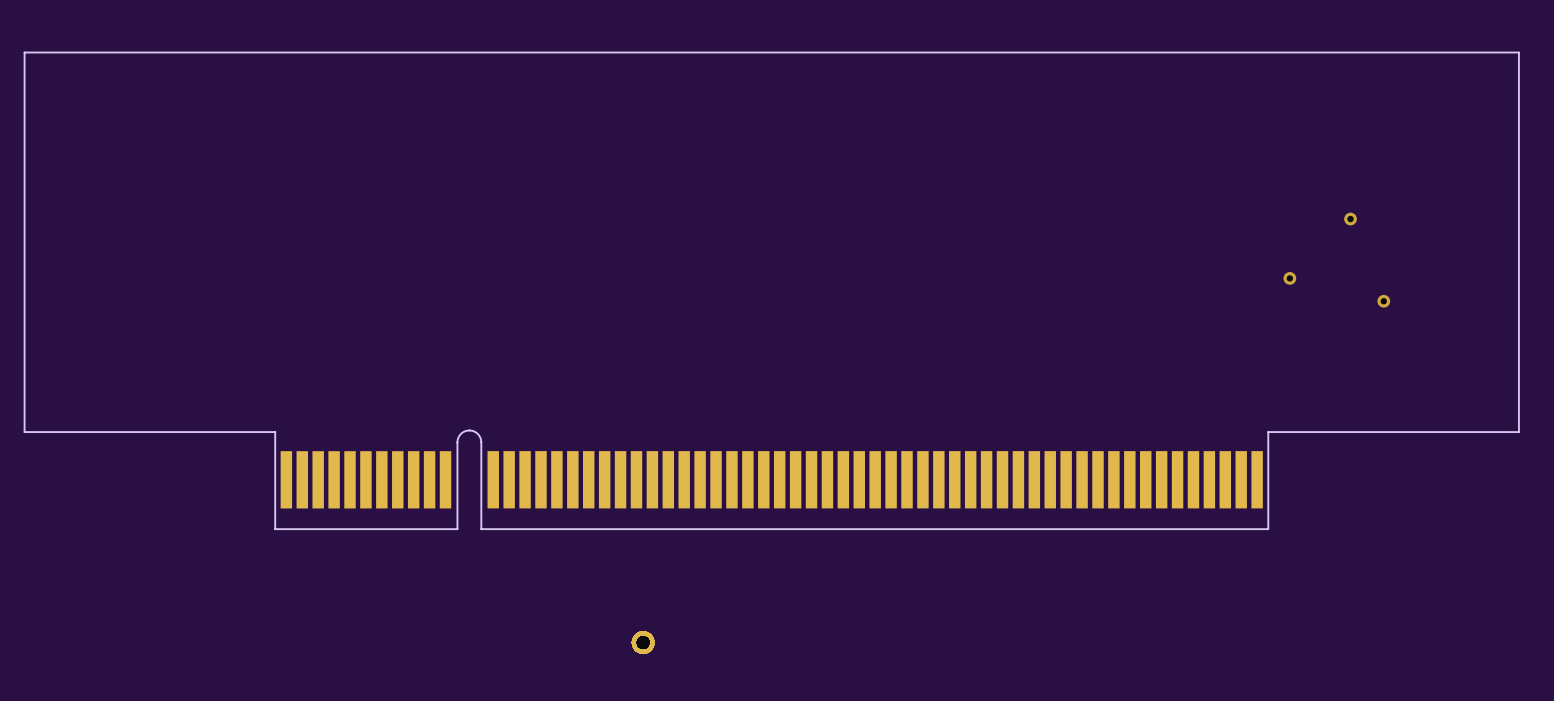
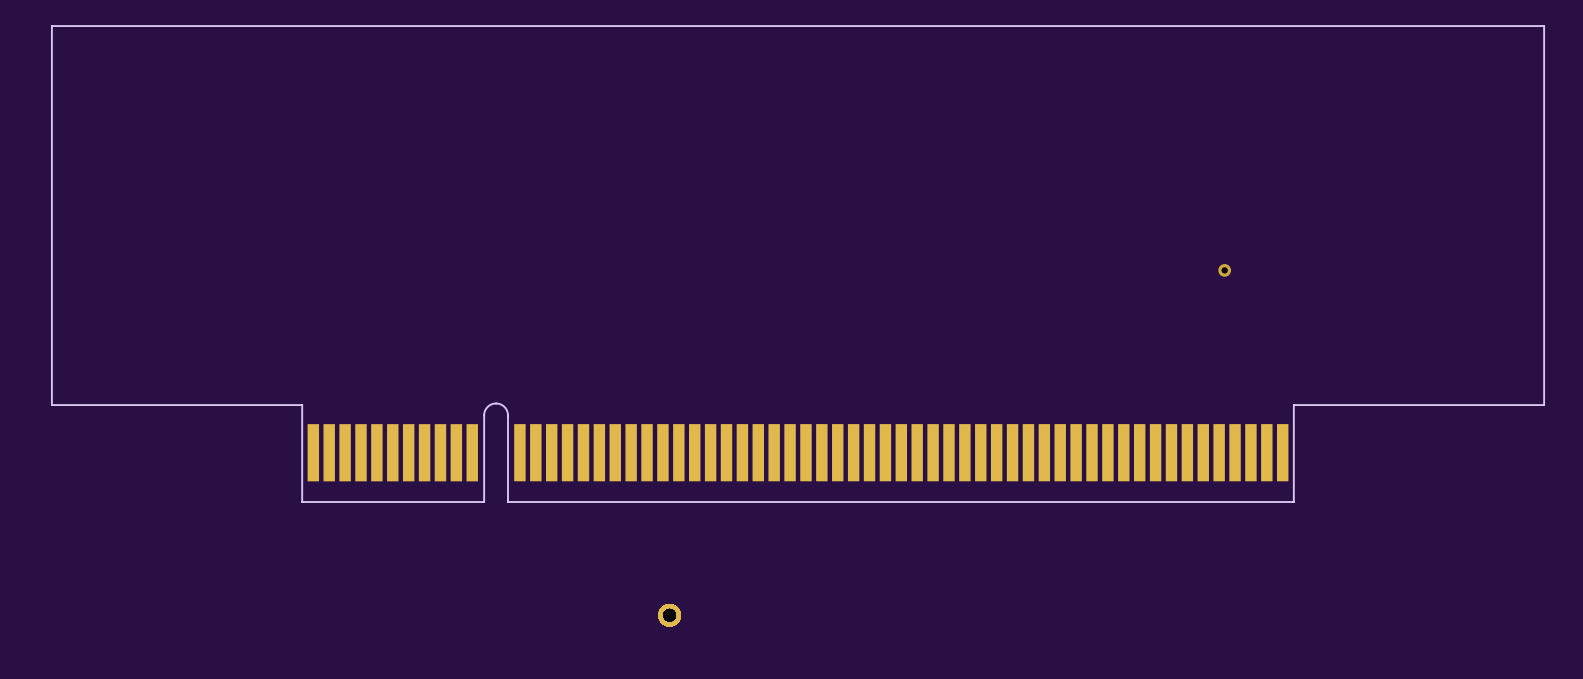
via: (1350, 219) -> none
via: (1289, 278) -> none
via: none -> (1224, 270)
via: (1383, 301) -> none

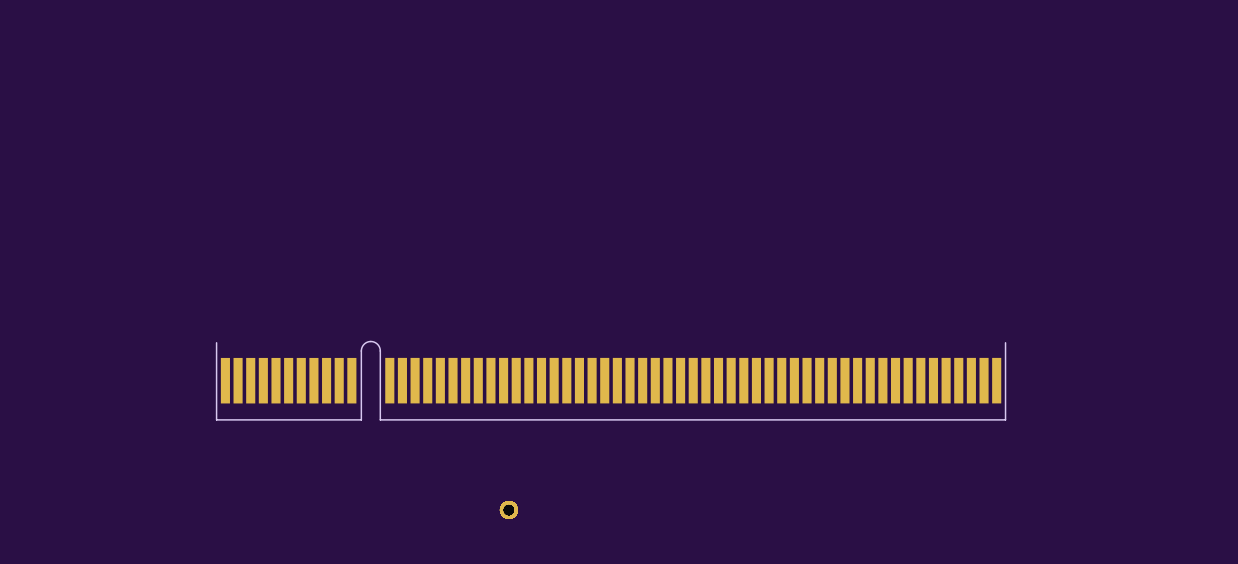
via: (1224, 270) -> none
board edge: (1293, 405) (1544, 405) (1544, 26) (51, 26) (51, 405) (302, 405) -> none

